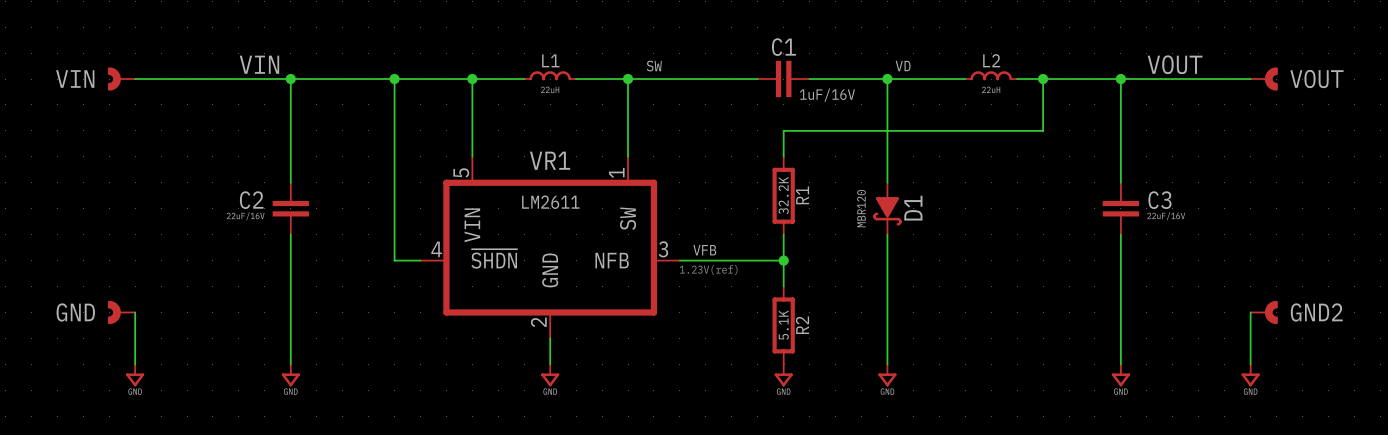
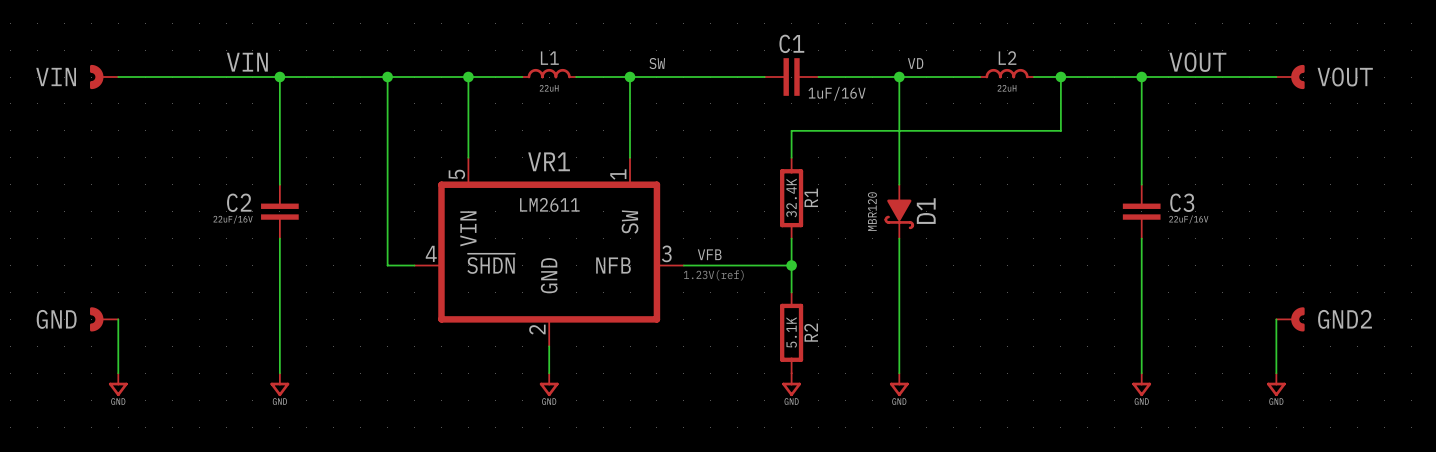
R1 value: 32.2K (783, 195) -> 32.4K (791, 198)

